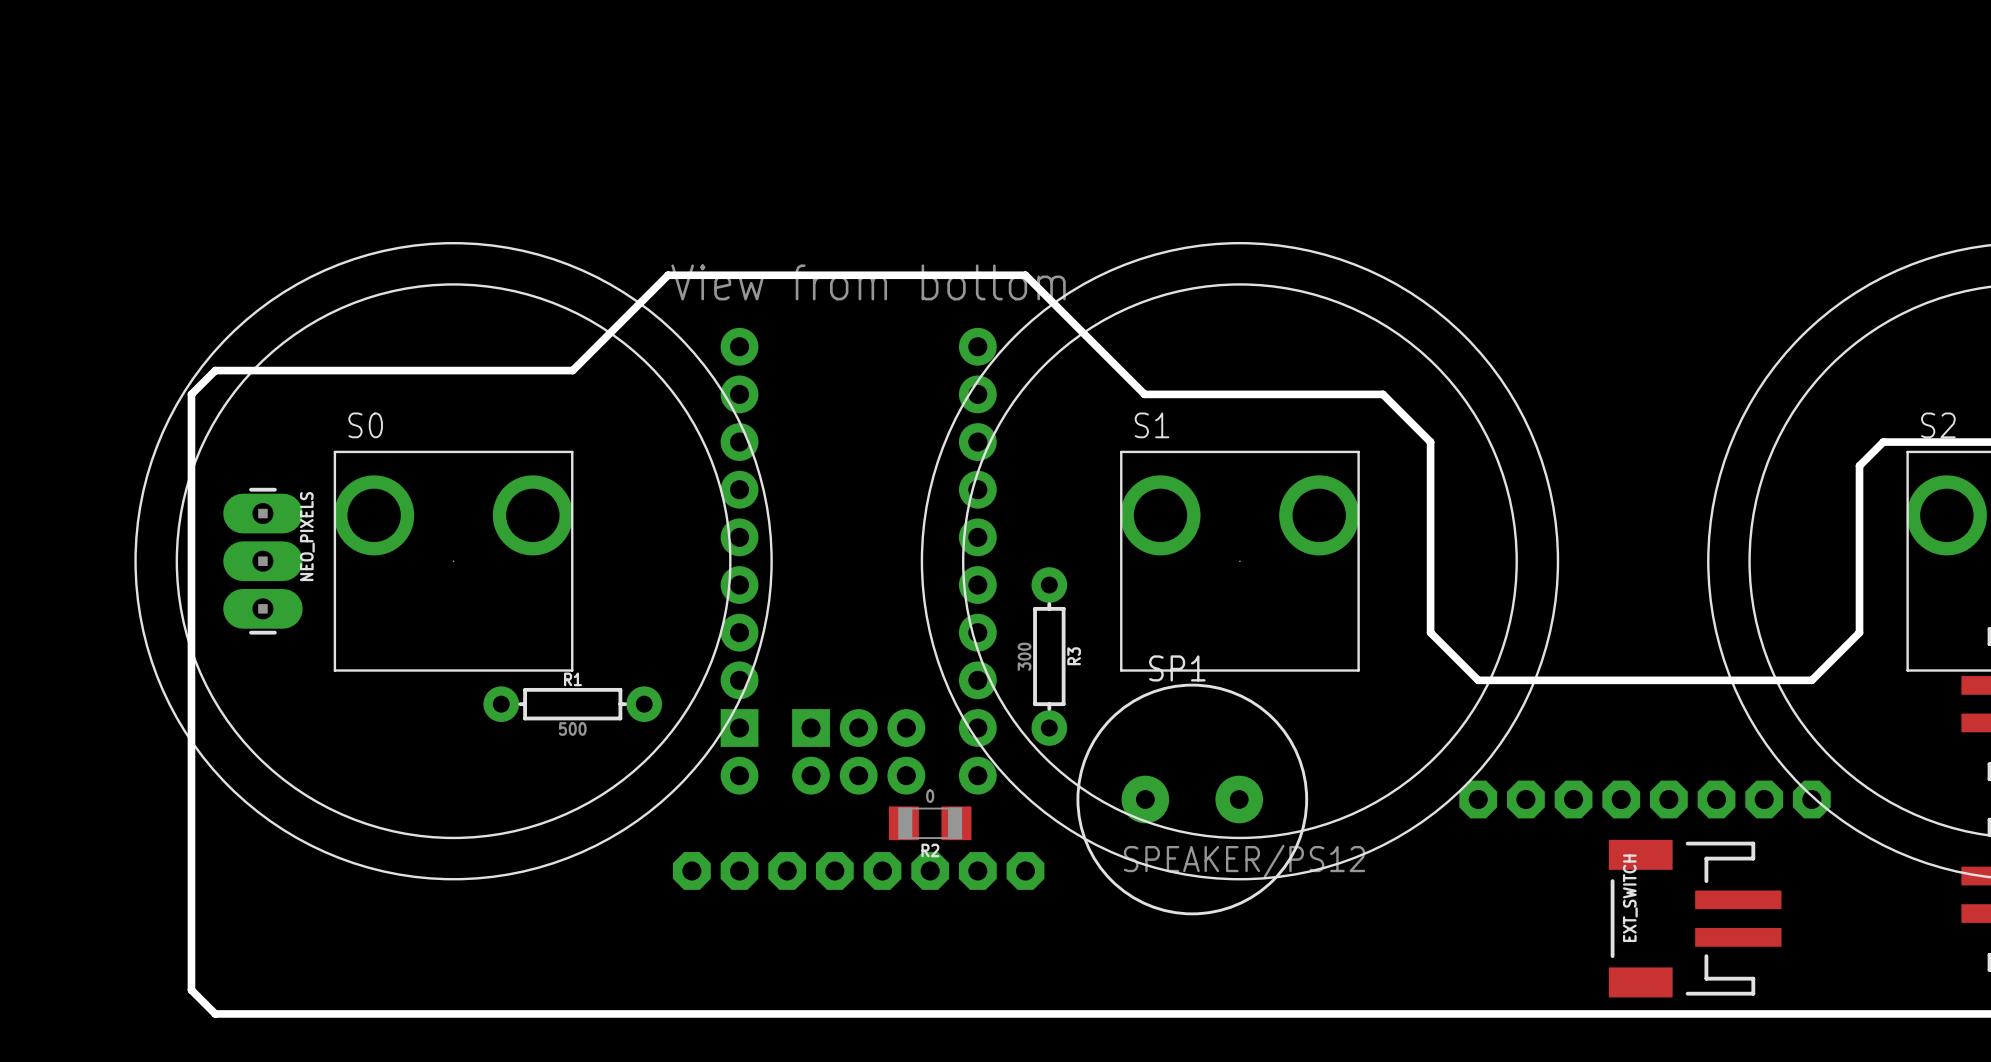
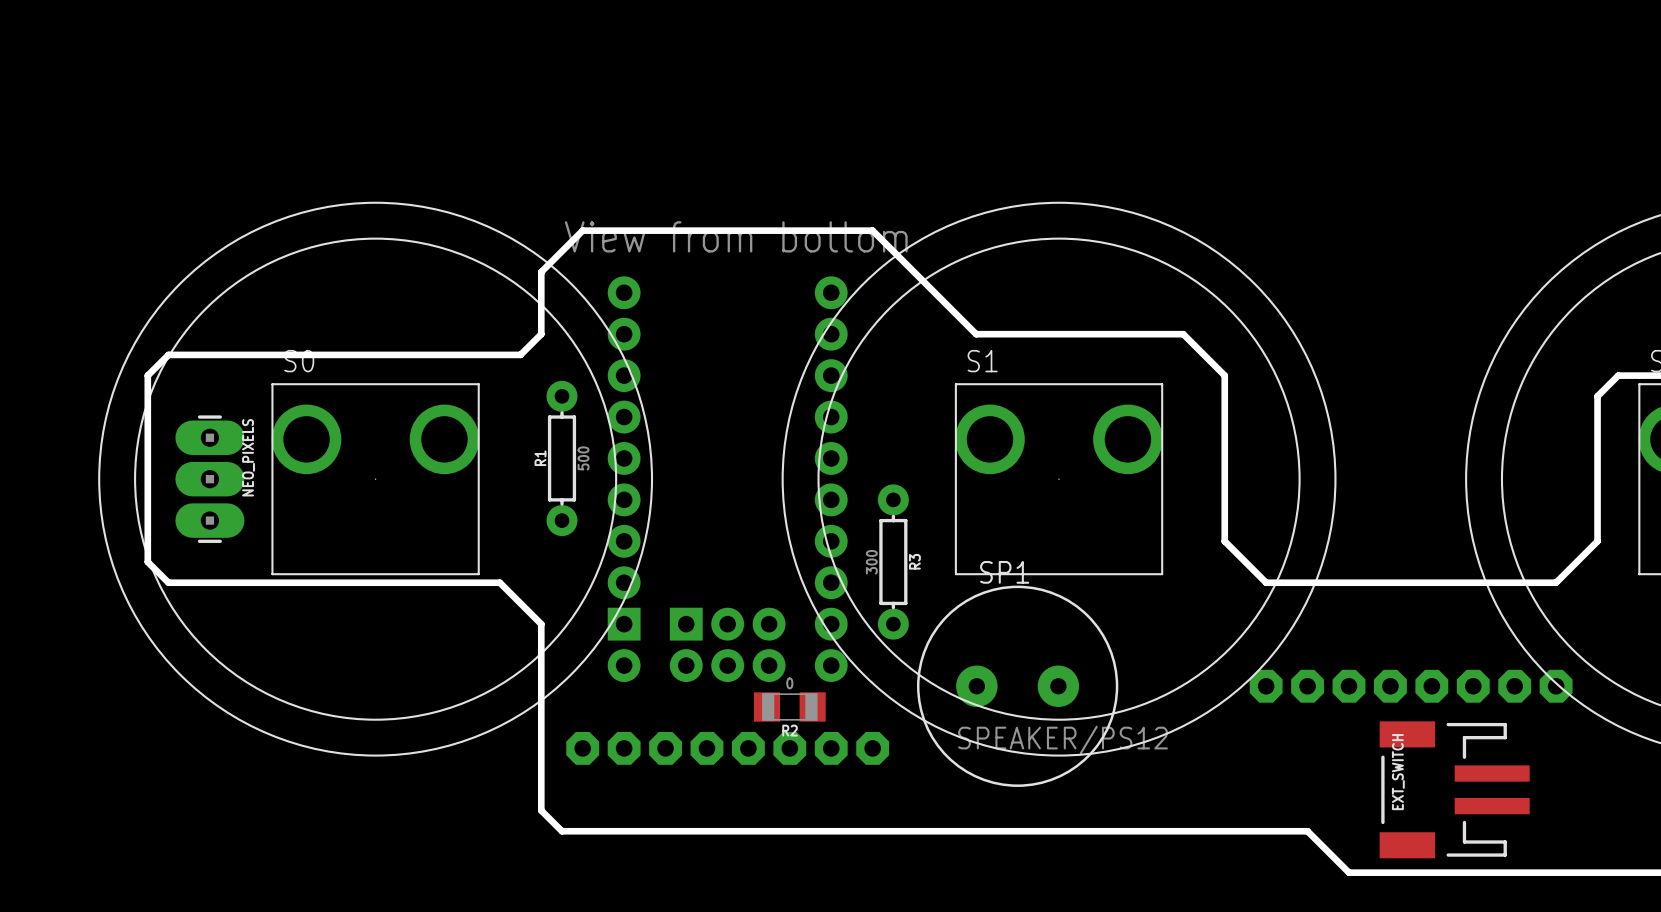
board edge: (691, 275) (668, 275) (572, 370) (215, 370) (191, 394) (191, 442) -> (582, 230) (541, 272) (541, 334) (520, 354) (168, 354) (147, 375)
board edge: (191, 656) (191, 990) (215, 1013) (1573, 1013) -> (147, 562) (168, 582) (499, 582) (541, 624) (541, 810) (562, 831) (1307, 831) (1349, 872)
R1 rotation: 0° (572, 704) -> 90° clockwise (562, 458)
R1 position: (572, 704) -> (562, 458)

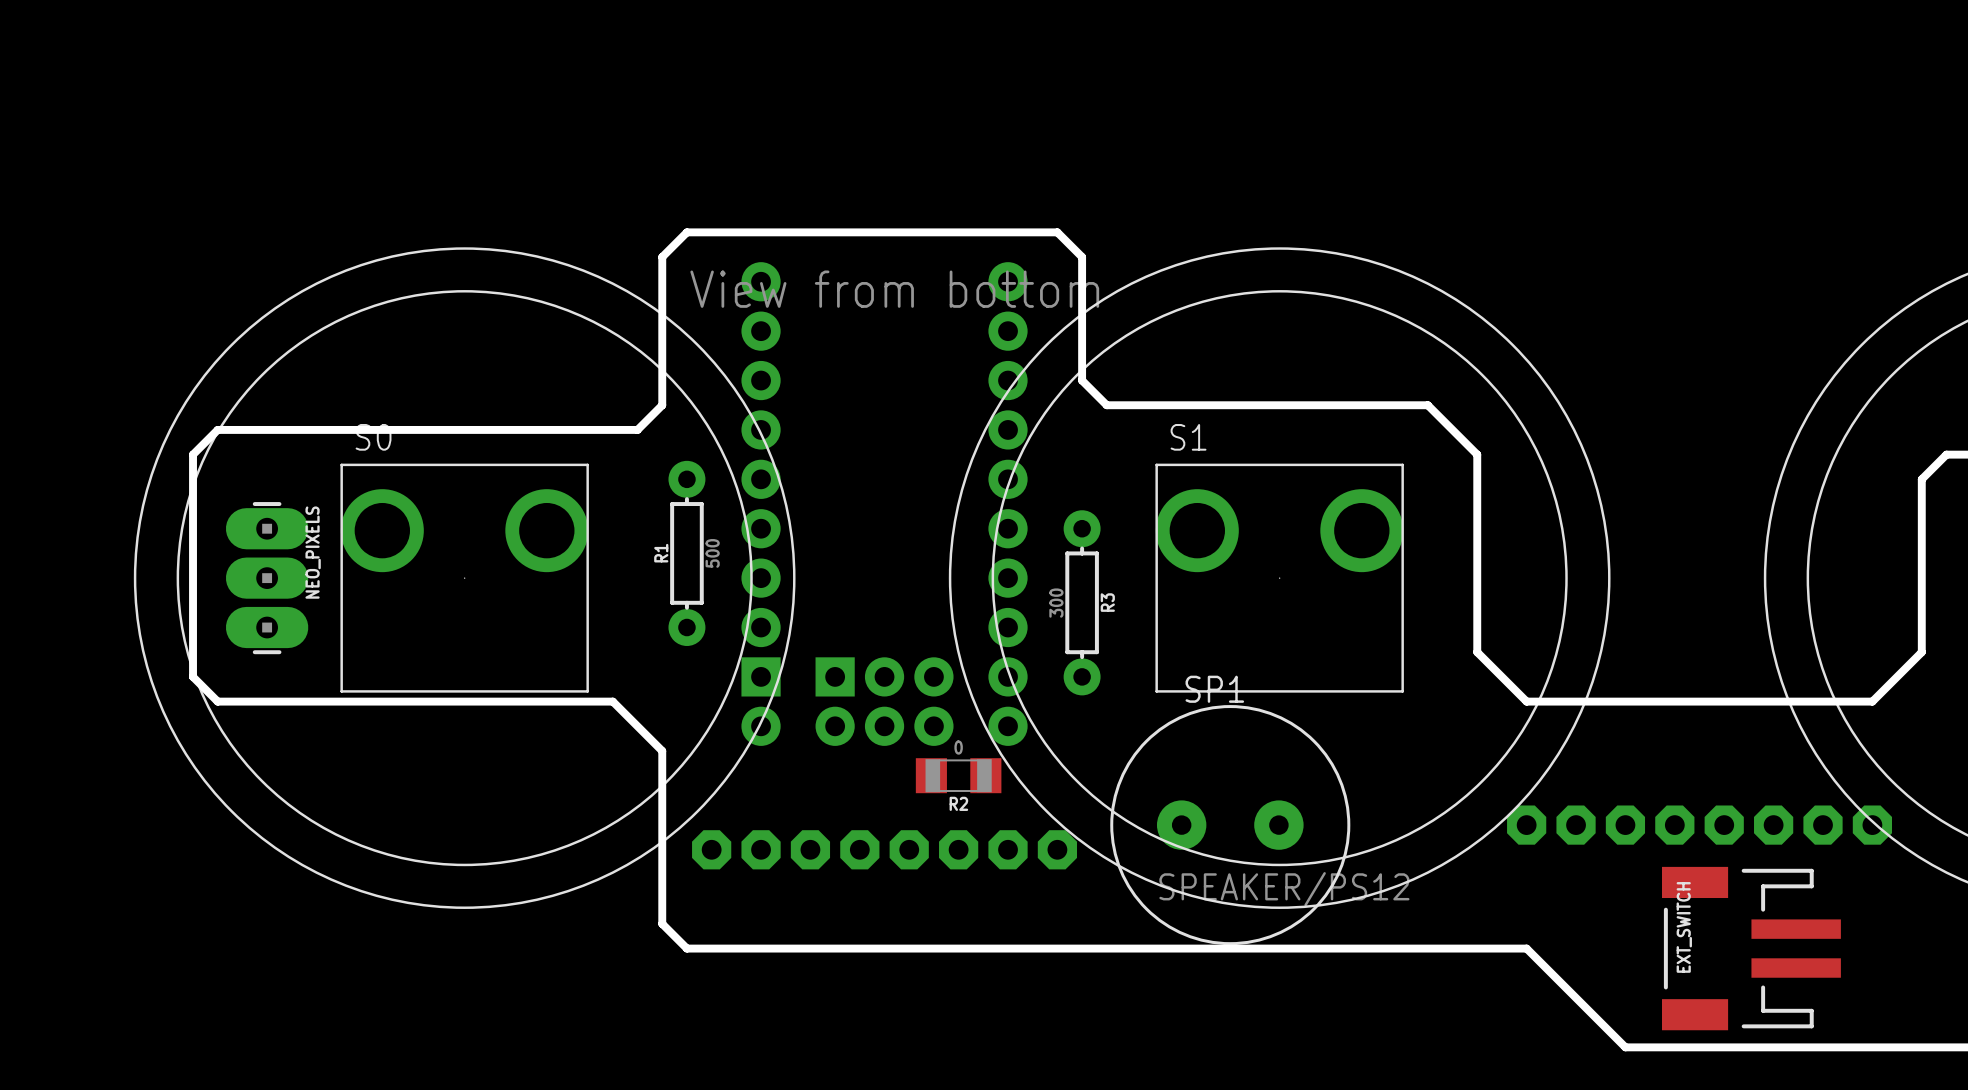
board edge: (541, 272) (582, 230) (872, 230) (976, 334) -> (662, 331) (662, 257) (686, 232) (1057, 232) (1082, 257) (1082, 380) (1106, 405) (1180, 405)
part position: (727, 479) -> (884, 504)
R3 position: (893, 562) -> (1082, 602)
R2 position: (789, 706) -> (958, 775)
part position: (727, 748) -> (884, 849)
board edge: (541, 769) (541, 810) (562, 831) (1307, 831) -> (662, 923) (686, 948) (1526, 948) (1576, 997)

